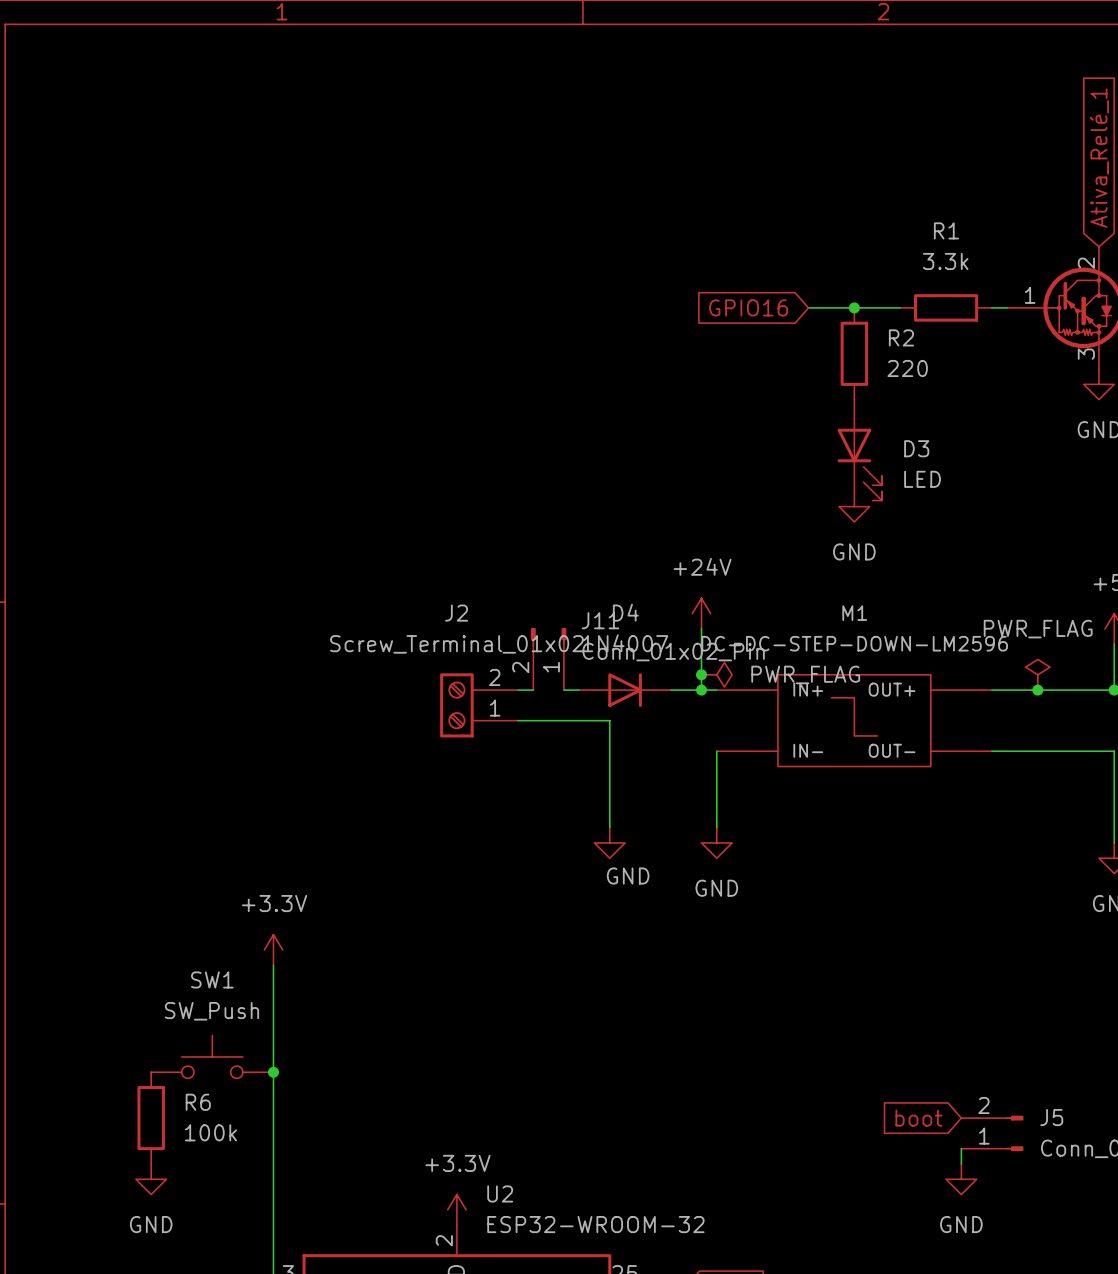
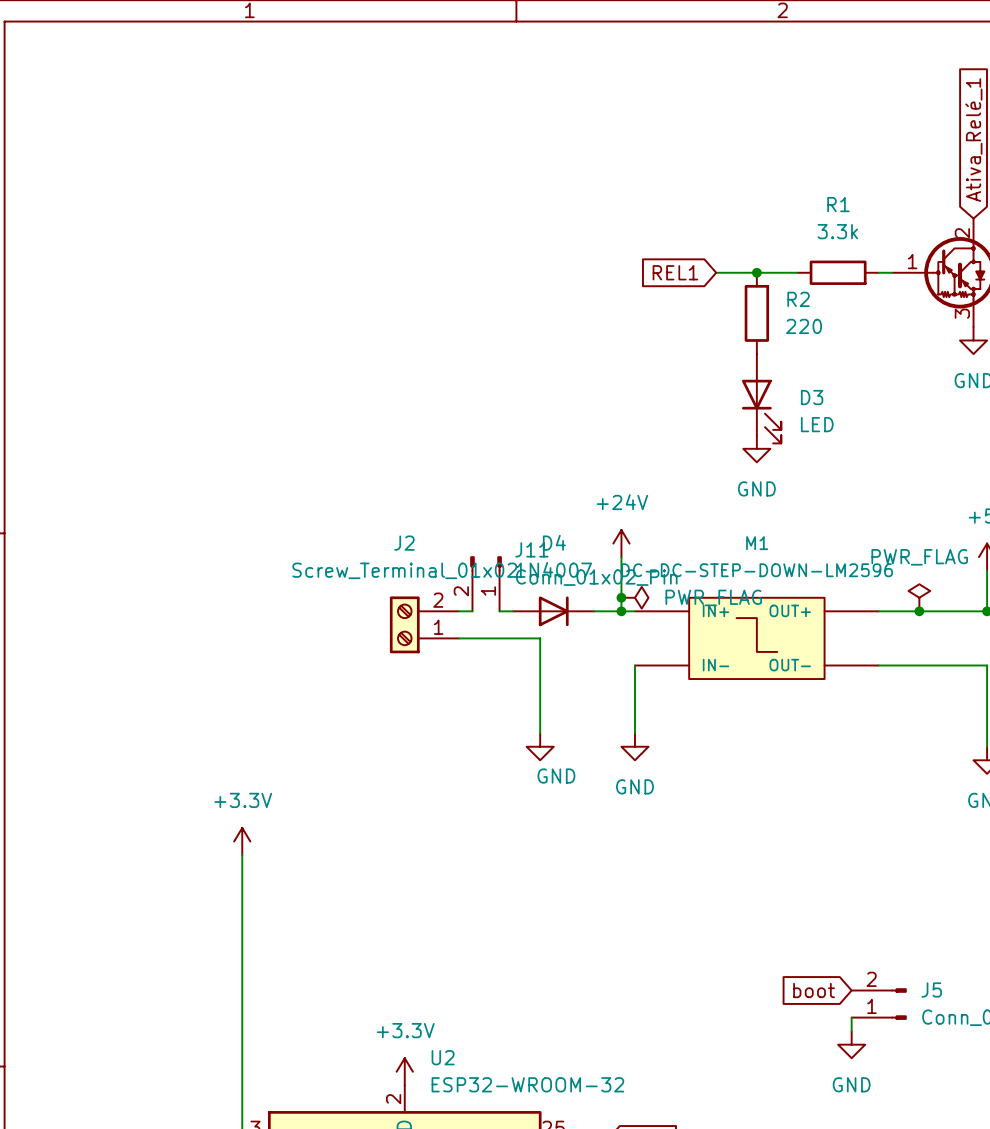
global label: GPIO16 (748, 307) -> REL1 (675, 272)
SW1: SW_Push (212, 1056) -> none
junction: (273, 1072) -> none
R6: 100k (151, 1118) -> none
power symbol: GND (151, 1179) -> none

